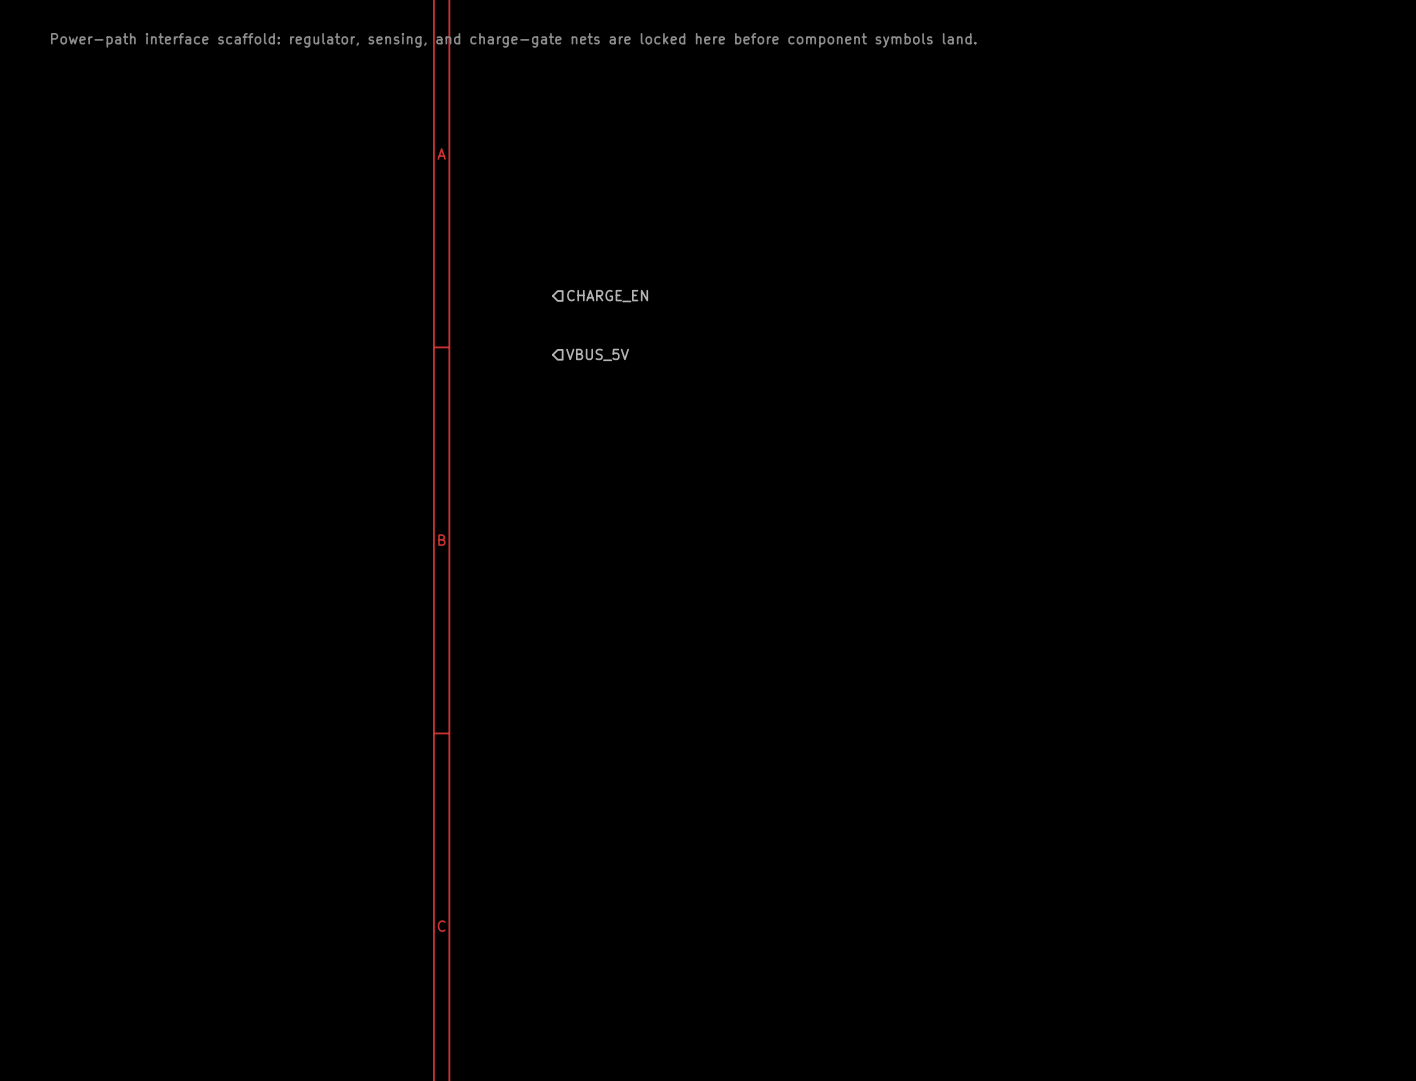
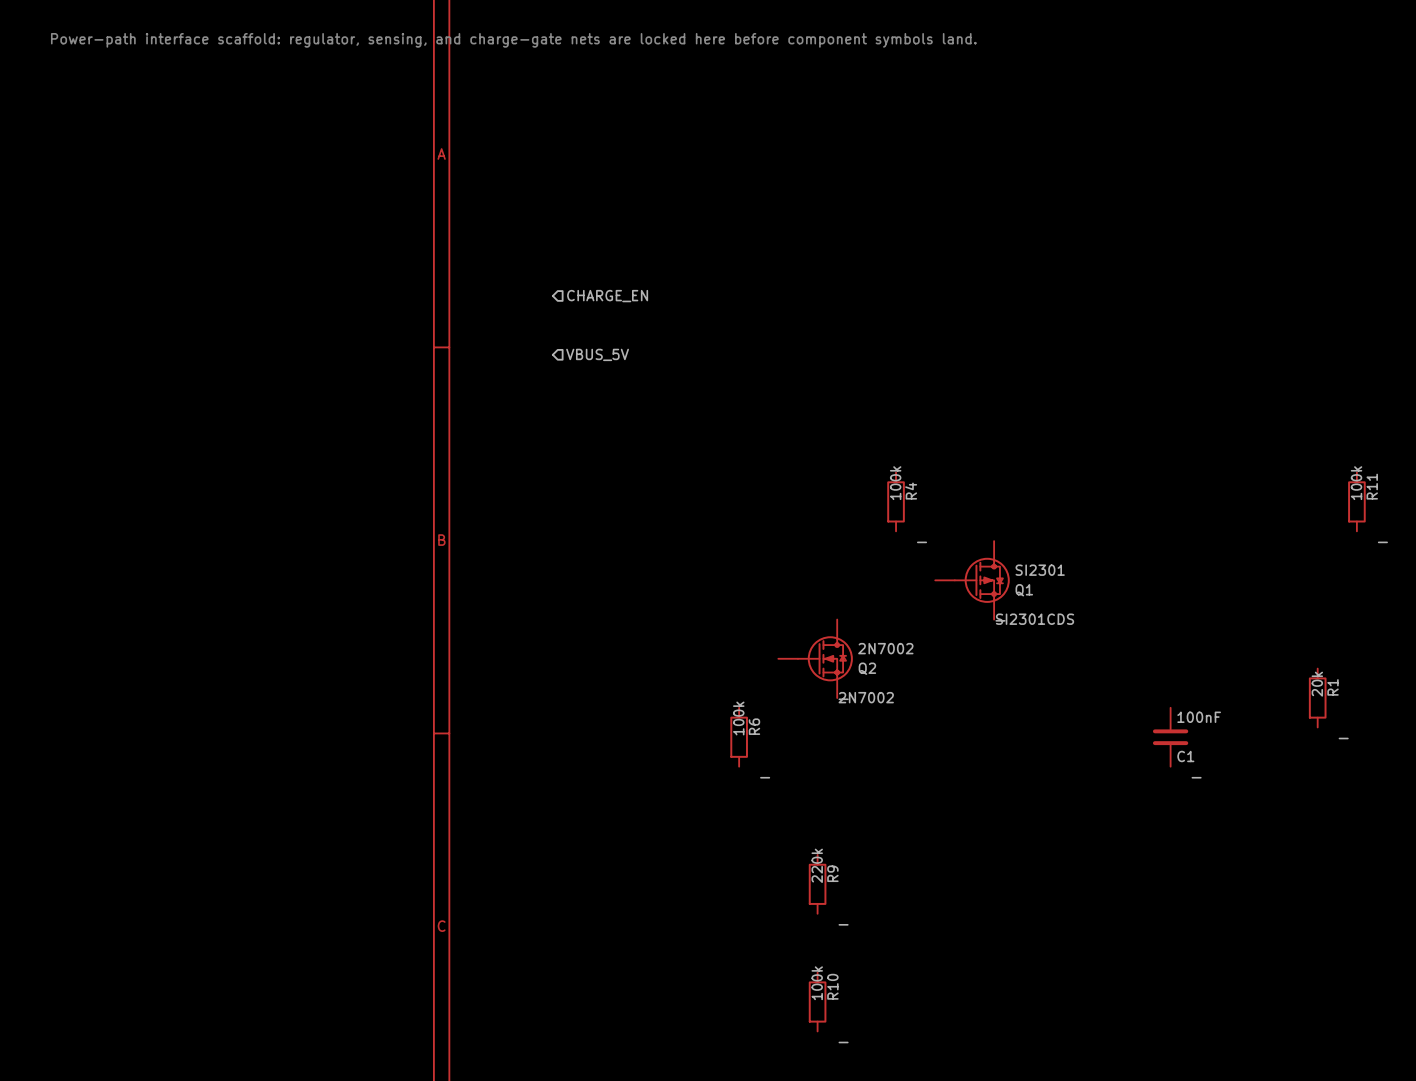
R4: none -> 100k (896, 501)
R11: none -> 100k (1356, 501)
Q1: none -> SI2301 (972, 580)
Q2: none -> 2N7002 (815, 658)
R1: none -> 20k (1317, 698)
R6: none -> 100k (739, 737)
C1: none -> 100nF (1170, 737)
R9: none -> 220k (817, 884)
R10: none -> 100k (817, 1002)

